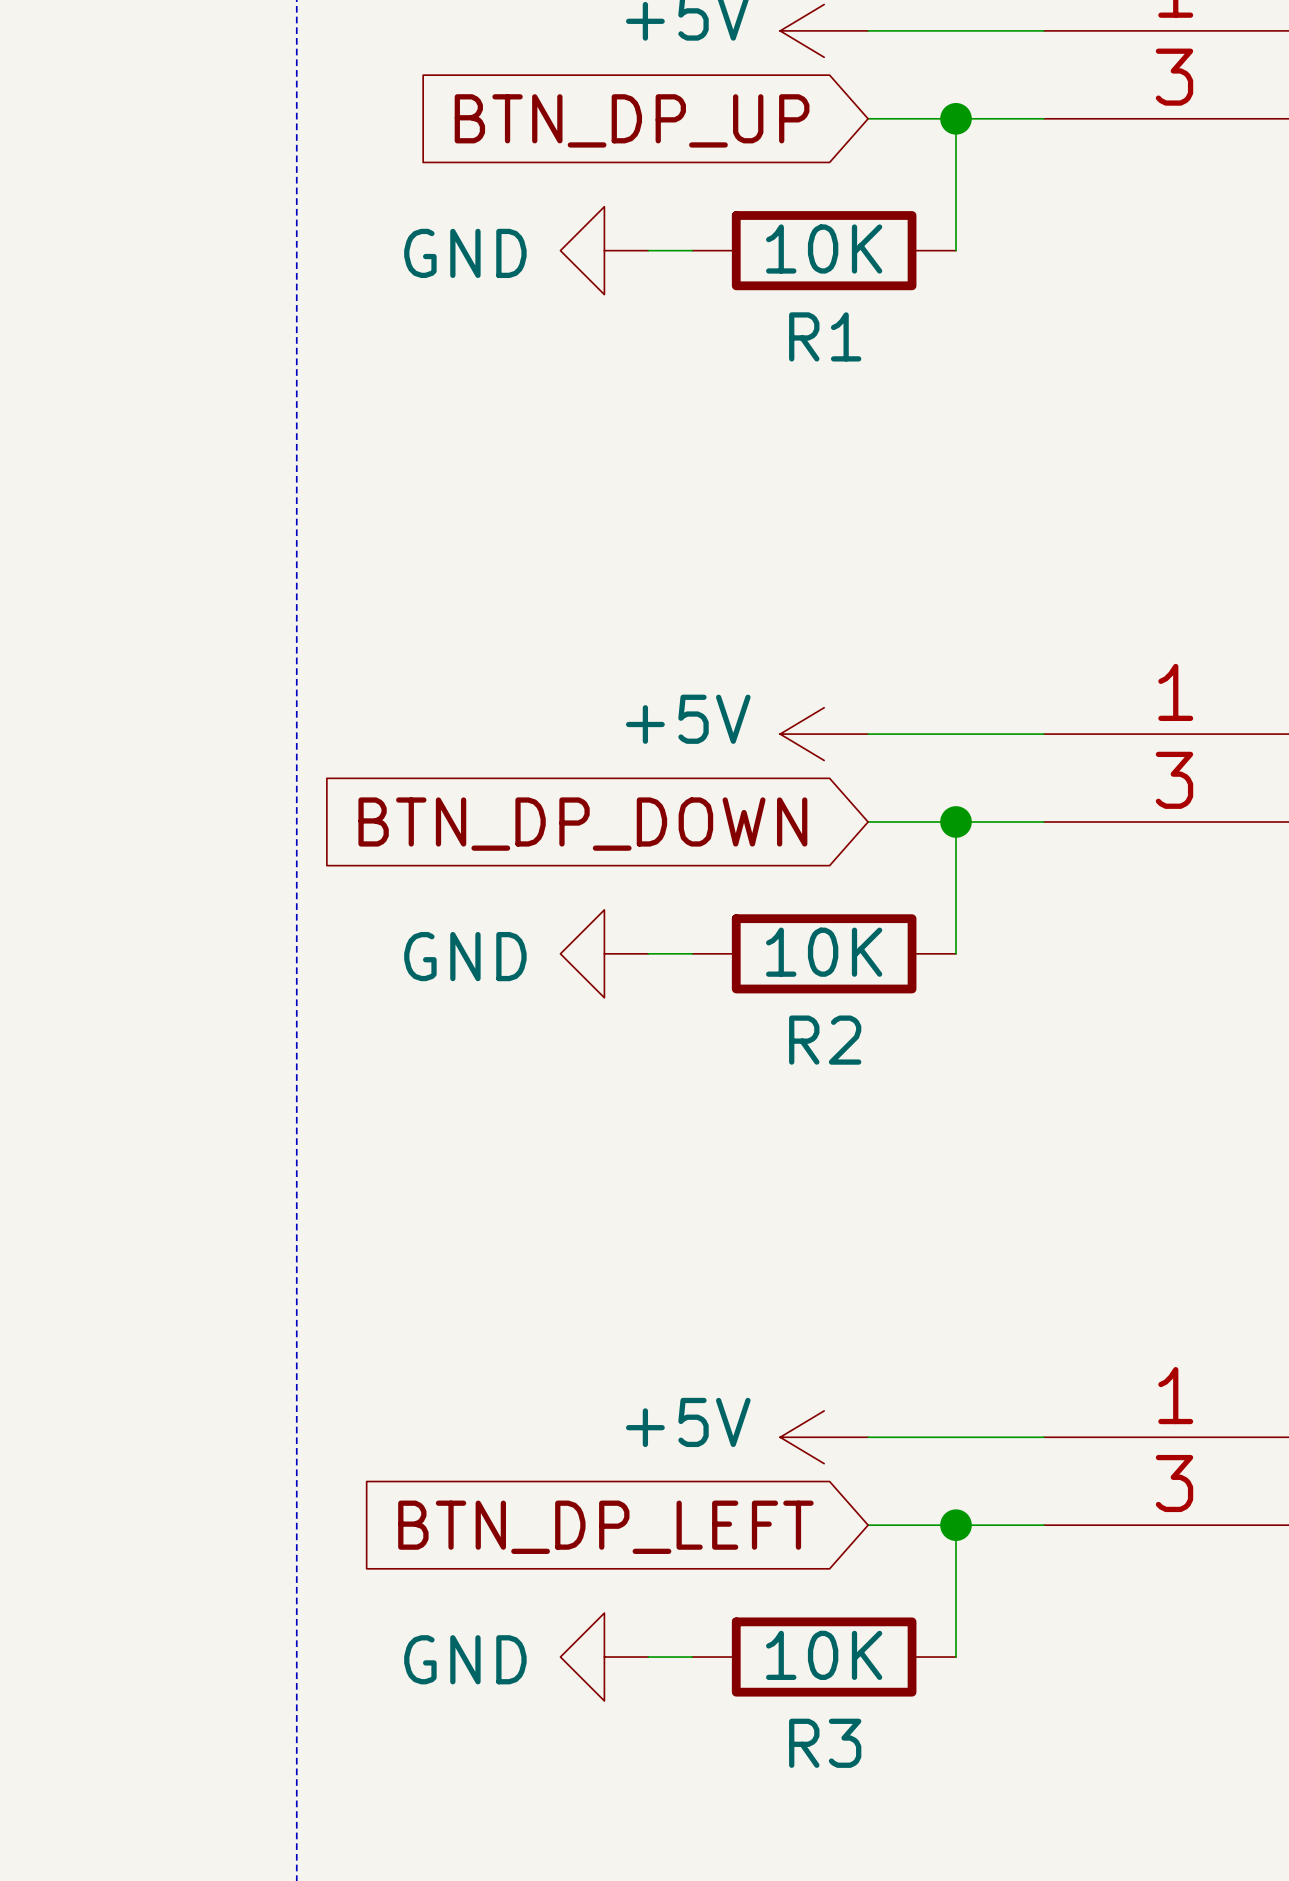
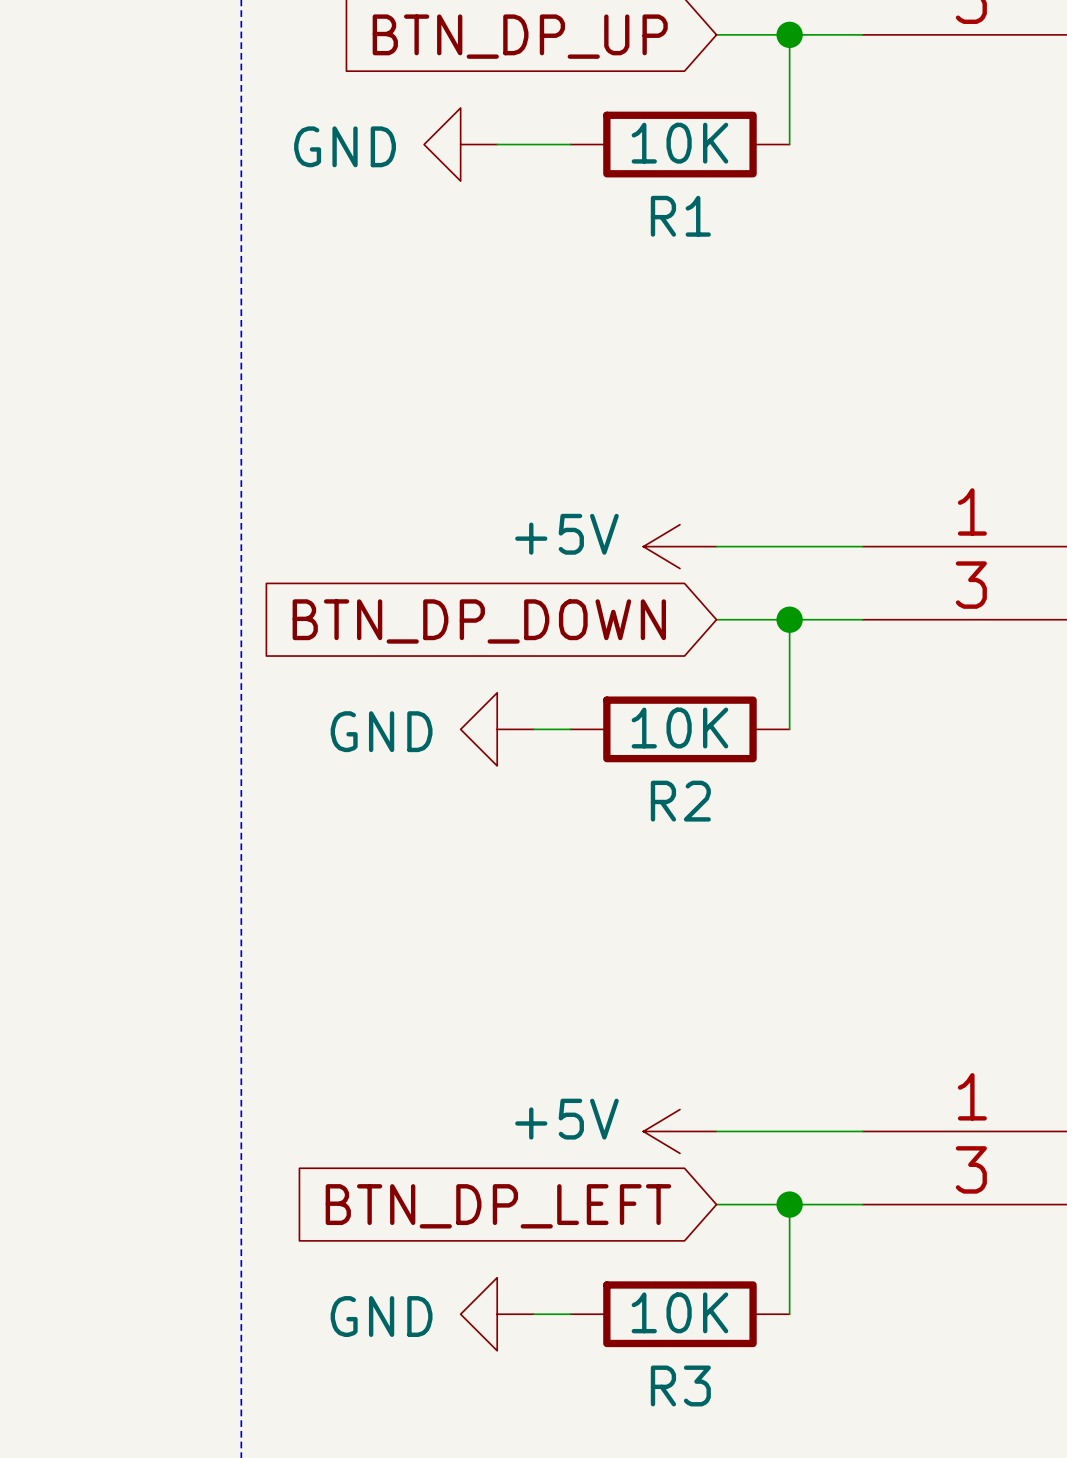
power symbol position: GND (604, 250) -> GND (460, 144)

